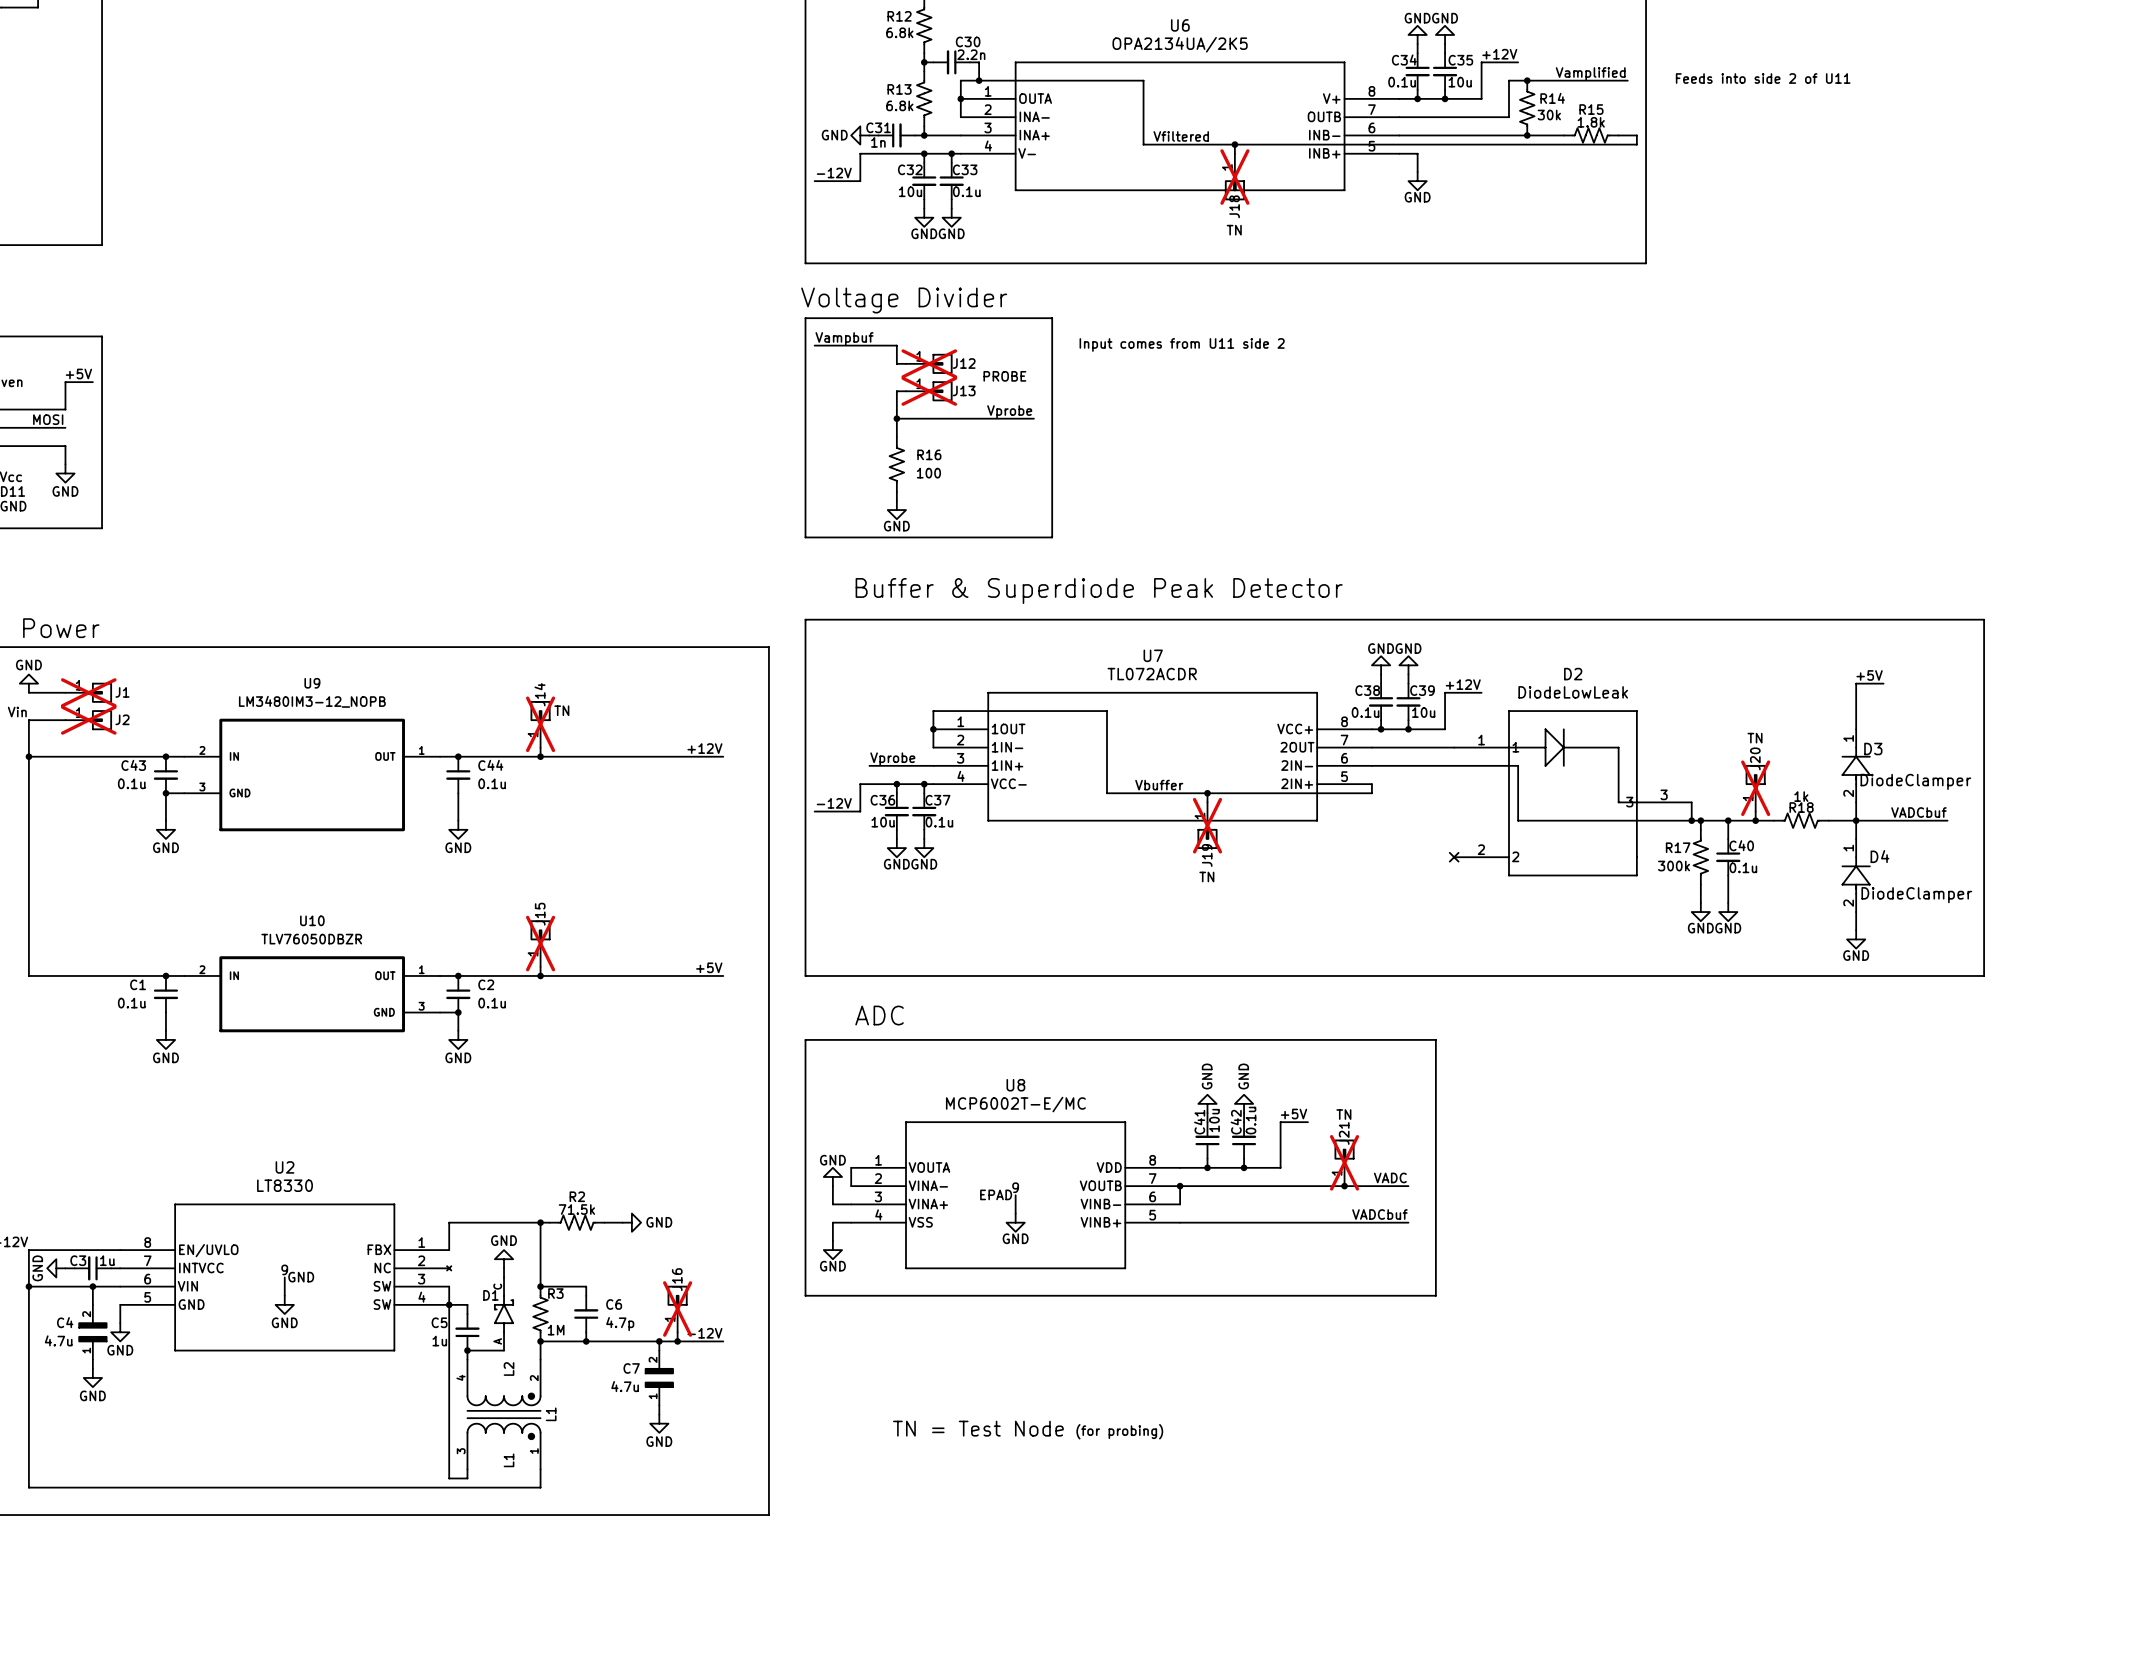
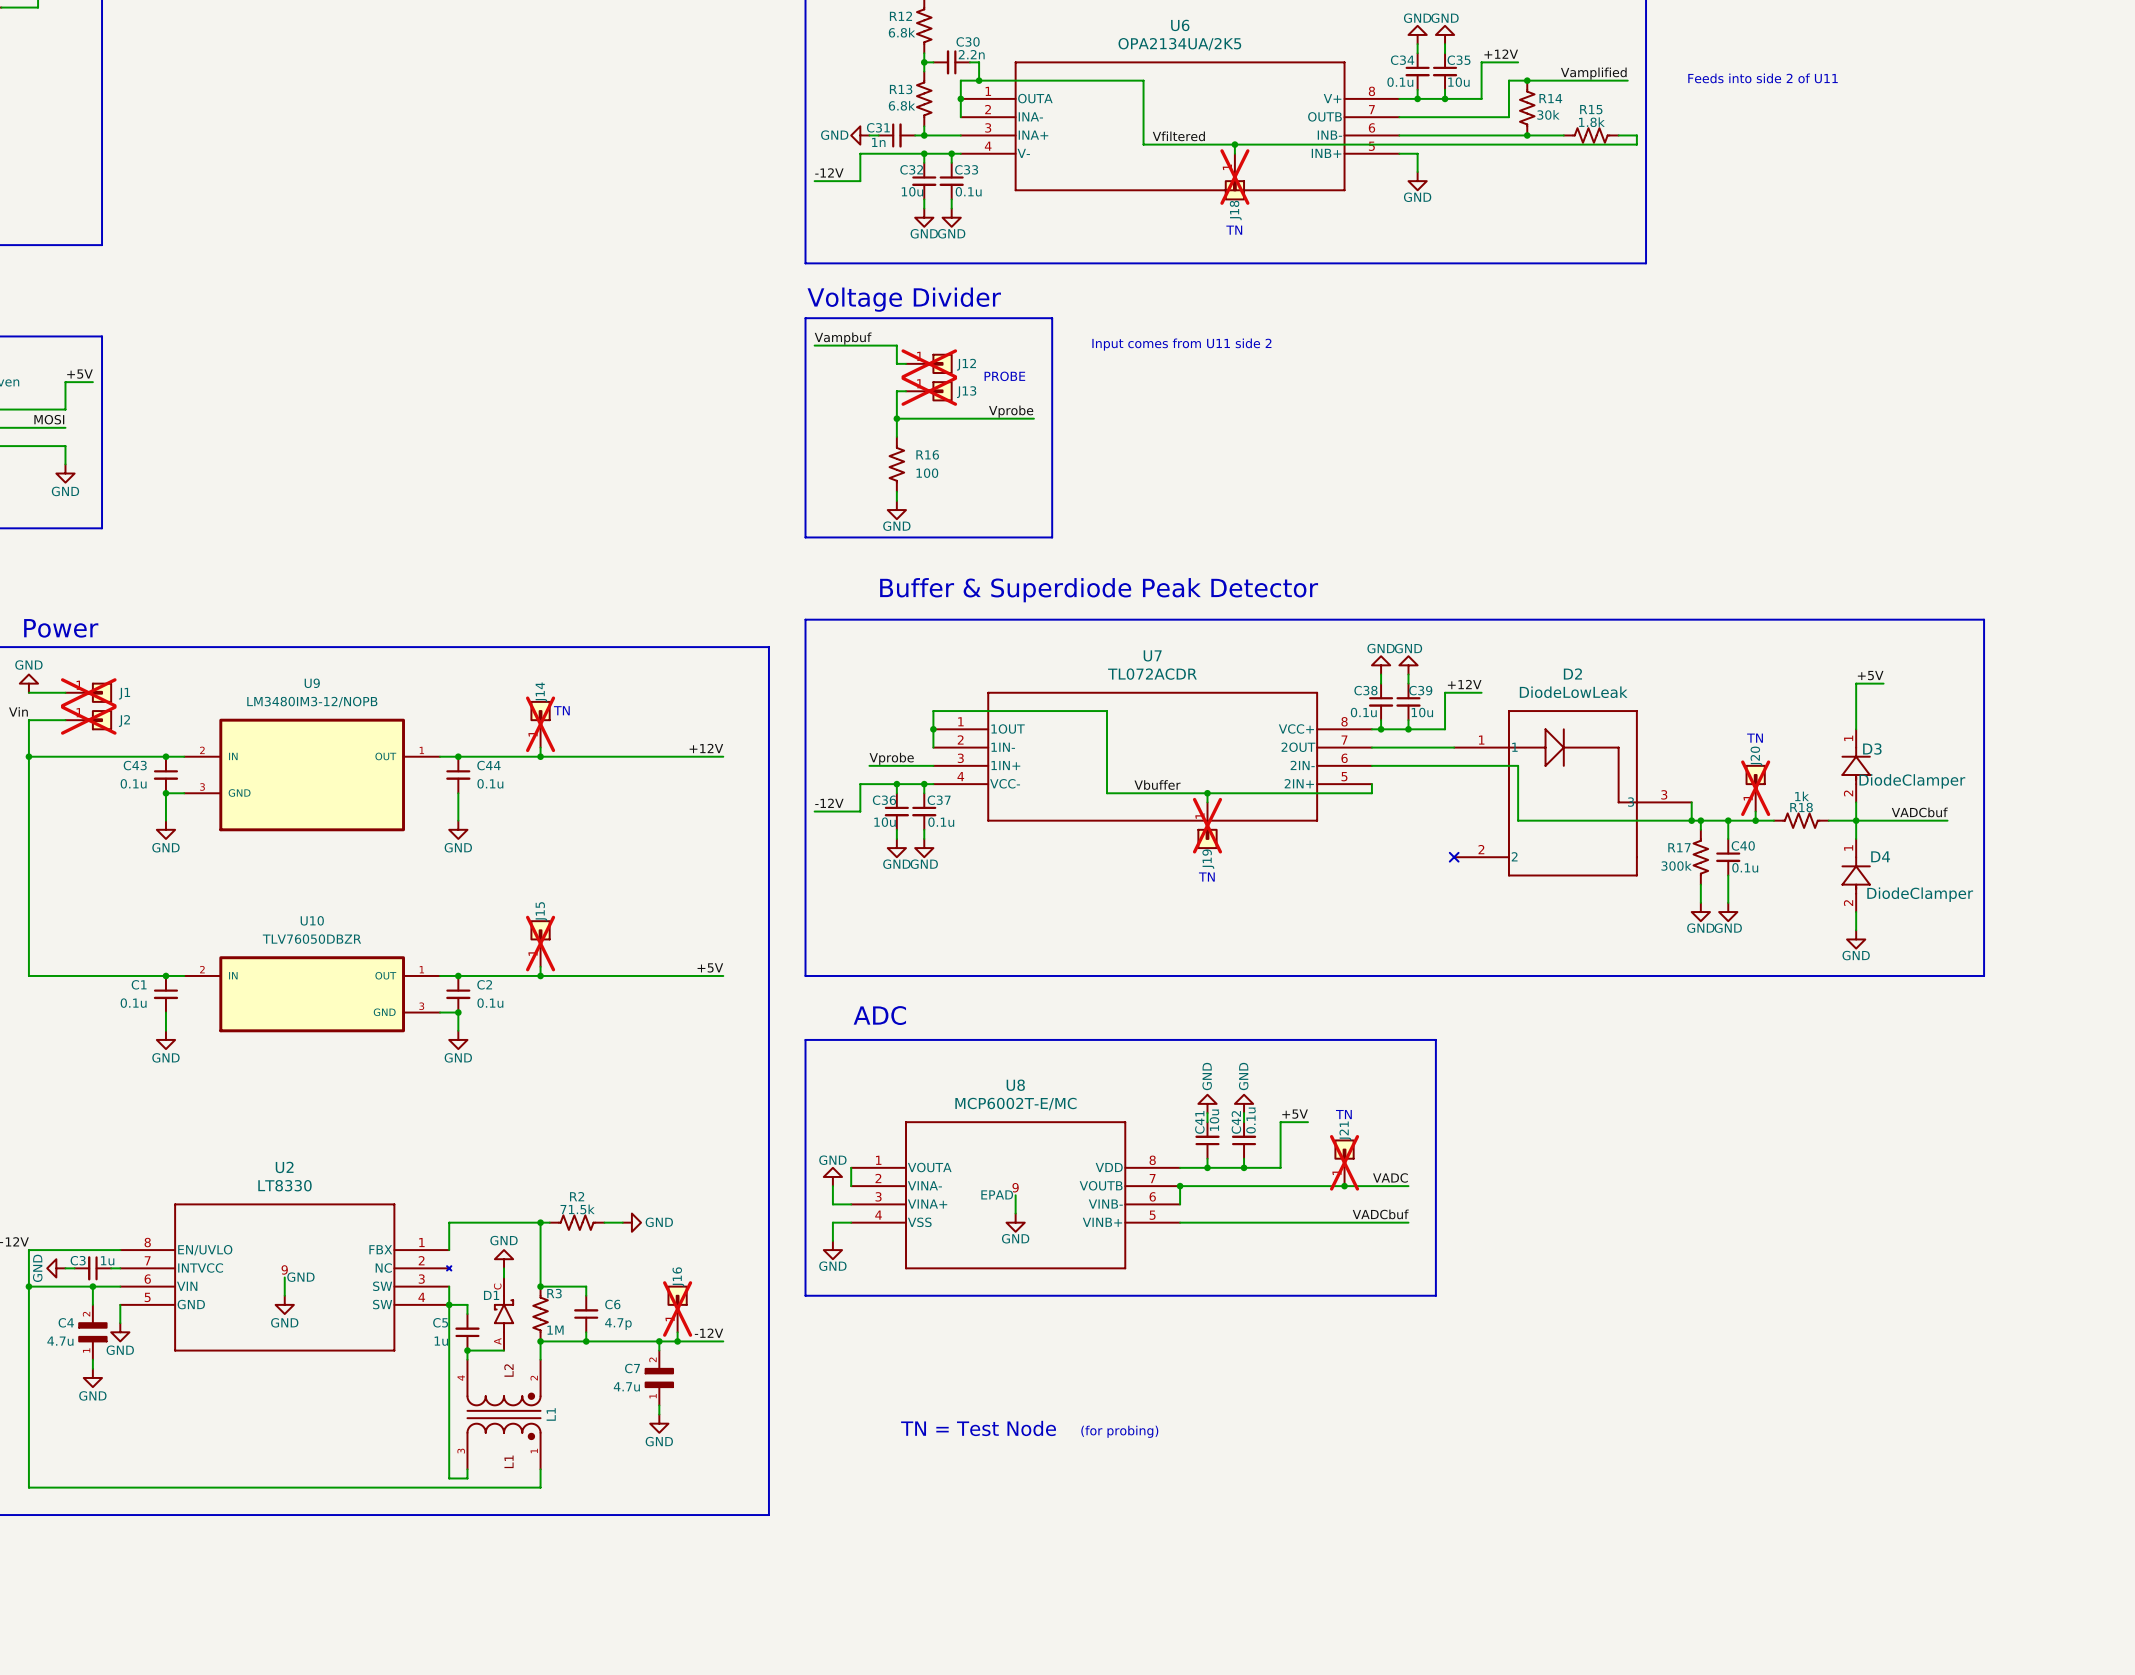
U9 value: LM3480IM3-12_NOPB (312, 701) -> LM3480IM3-12/NOPB (312, 702)

